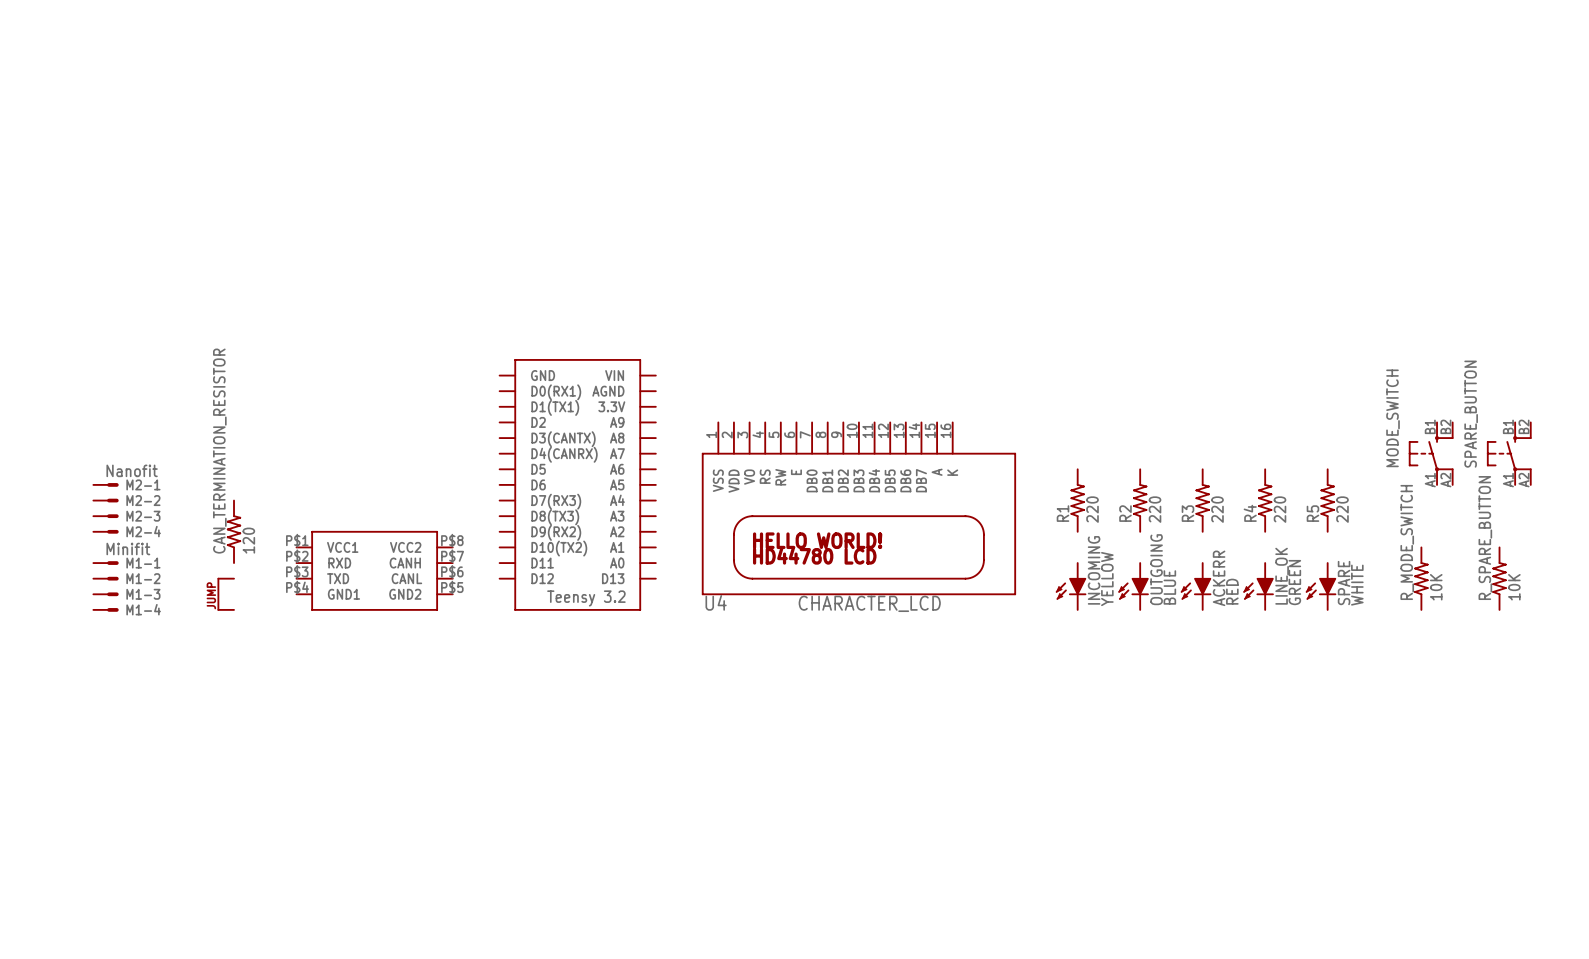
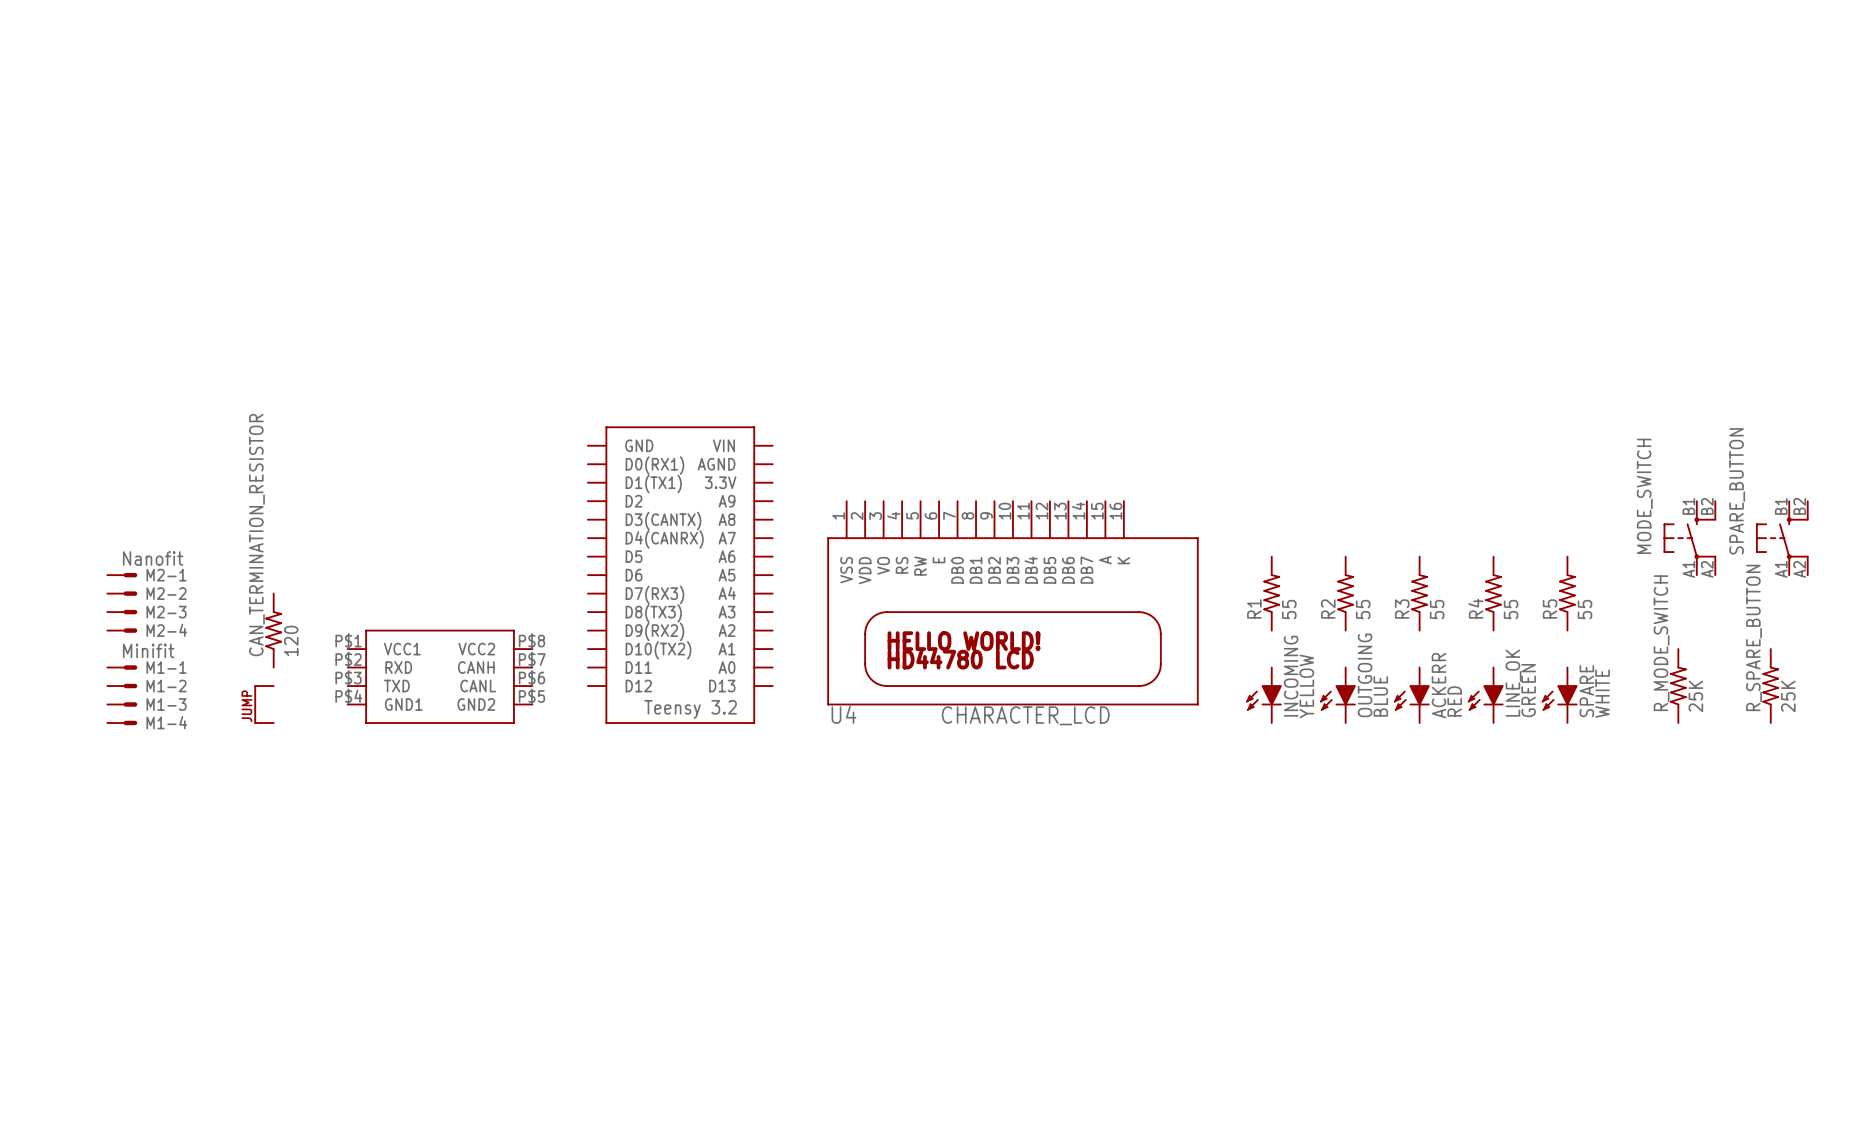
R1 value: 220 (1092, 509) -> 55 (1289, 609)
R2 value: 220 (1155, 509) -> 55 (1363, 609)
R3 value: 220 (1217, 509) -> 55 (1437, 609)
R4 value: 220 (1280, 509) -> 55 (1511, 609)
R5 value: 220 (1342, 509) -> 55 (1585, 609)
R_MODE_SWITCH value: 10K (1436, 587) -> 25K (1695, 696)
R_SPARE_BUTTON value: 10K (1514, 587) -> 25K (1788, 696)

